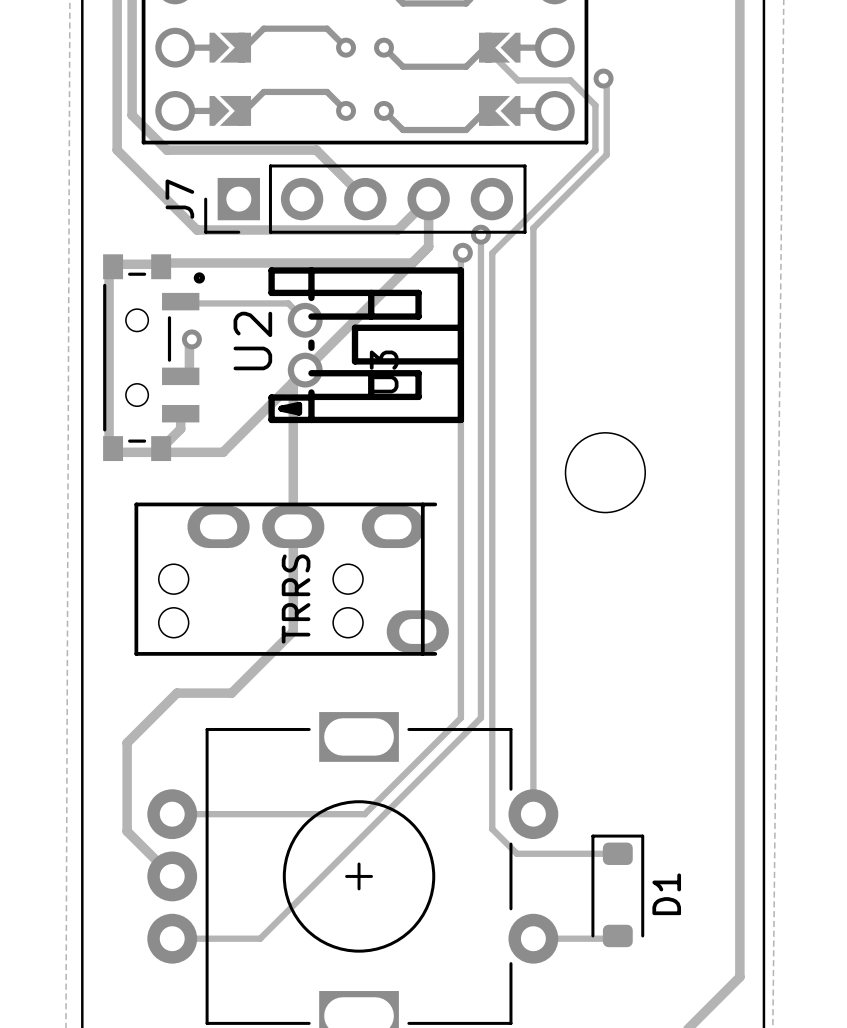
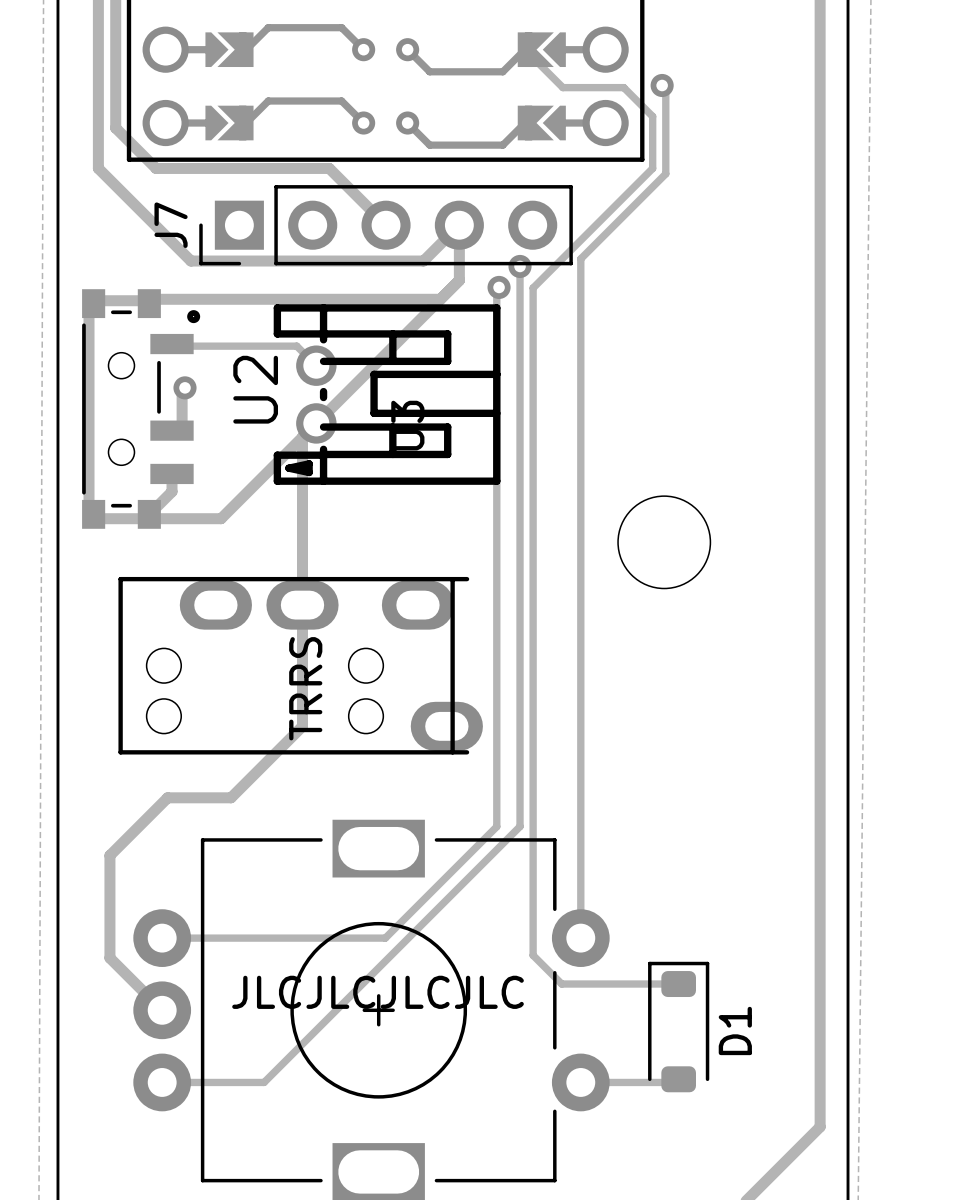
text: none -> JLCJLCJLCJLC (378, 992)

